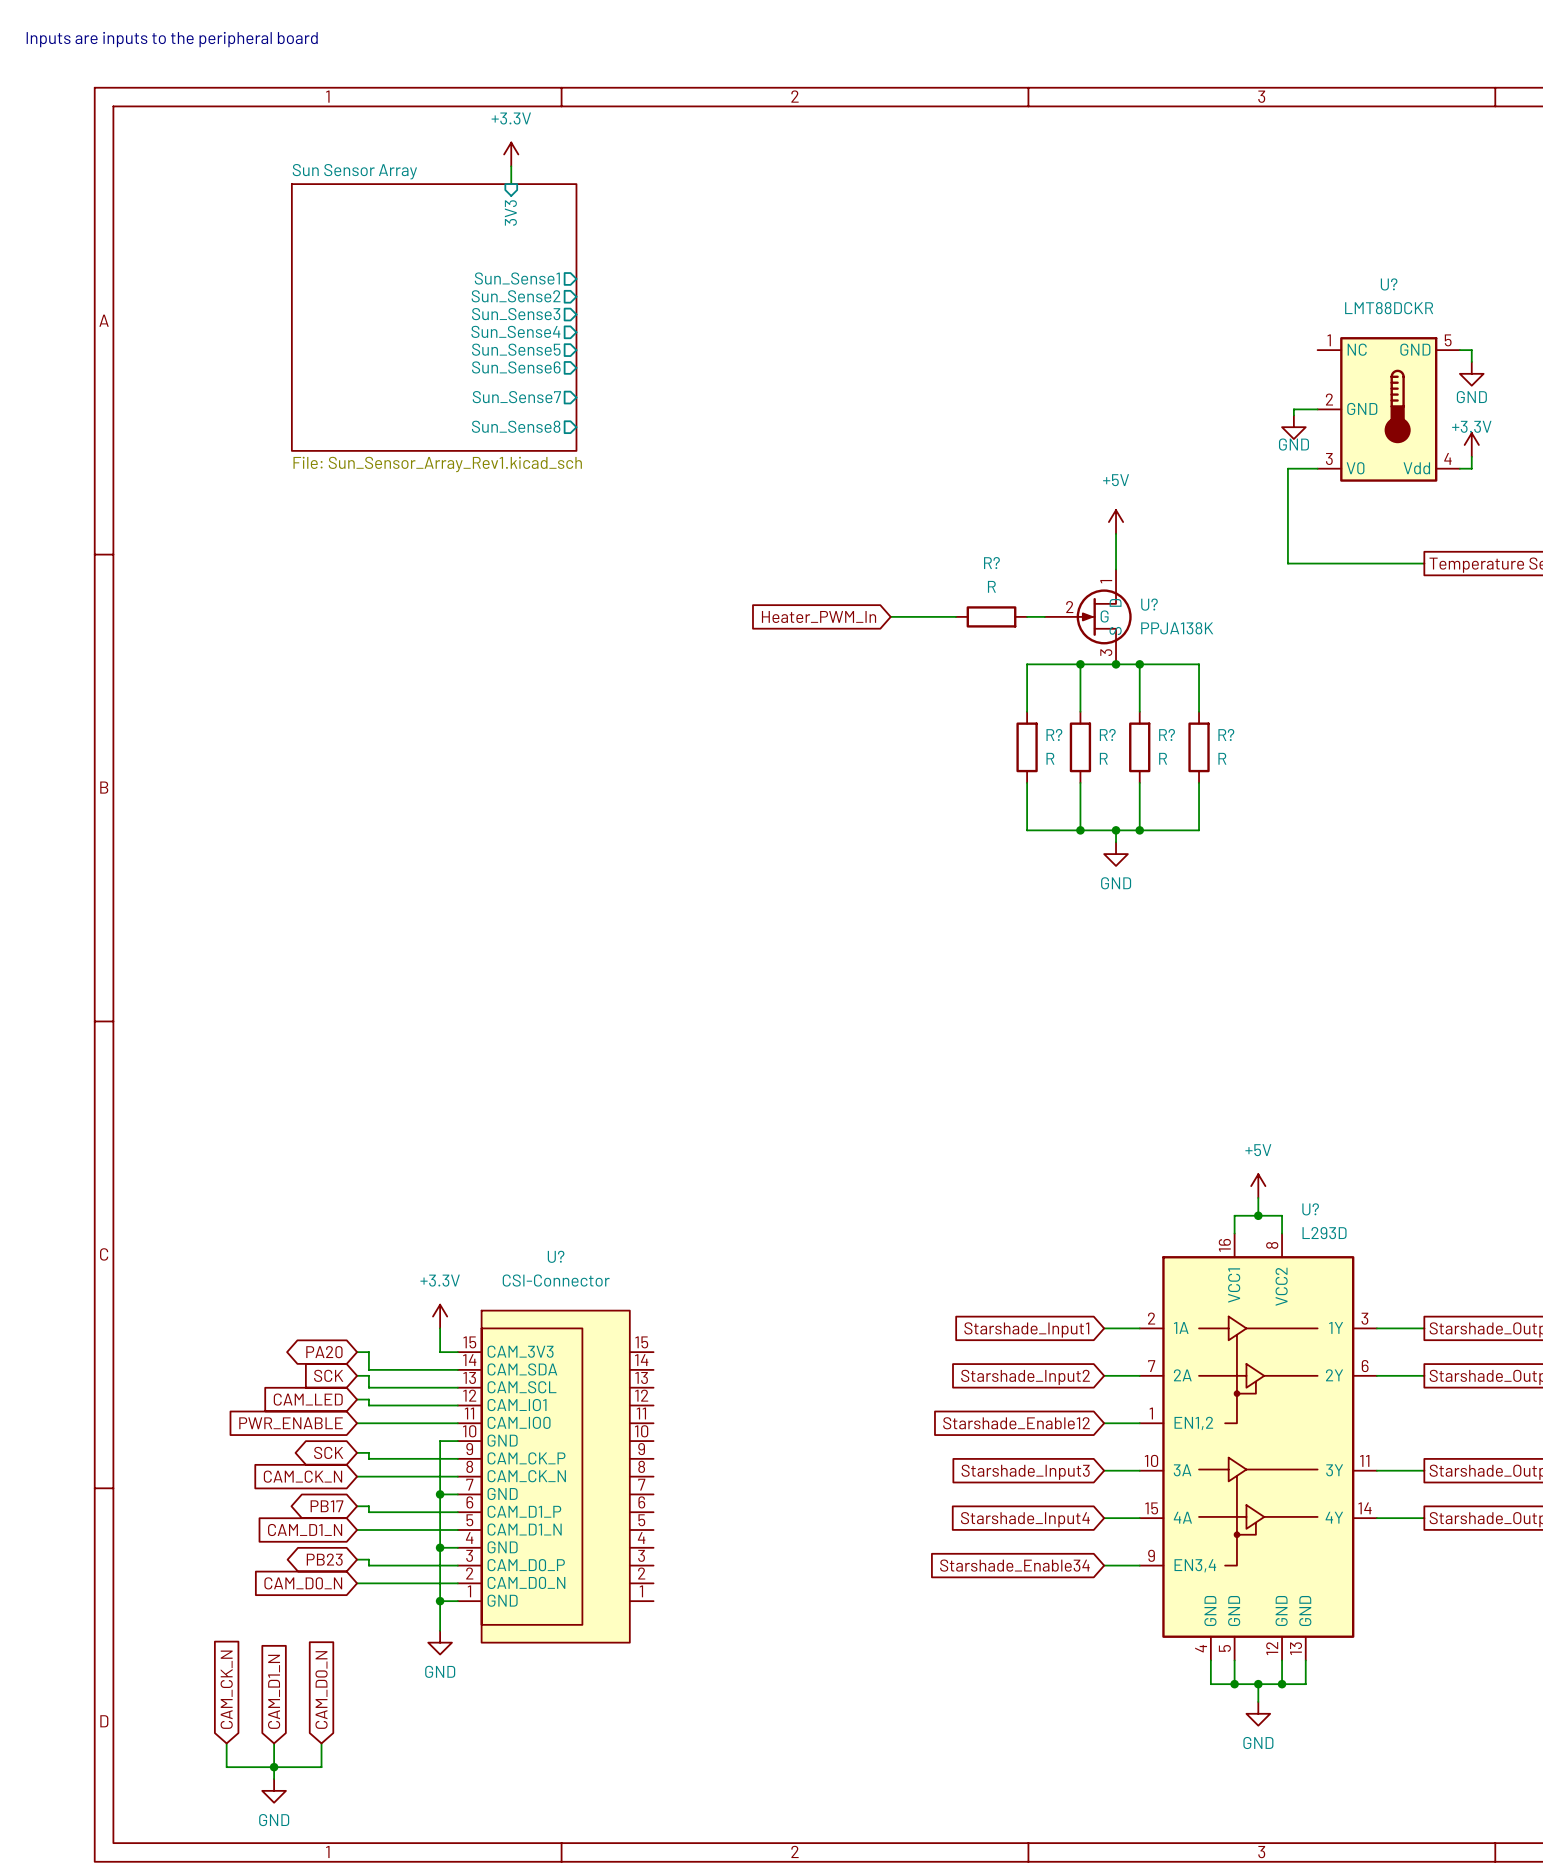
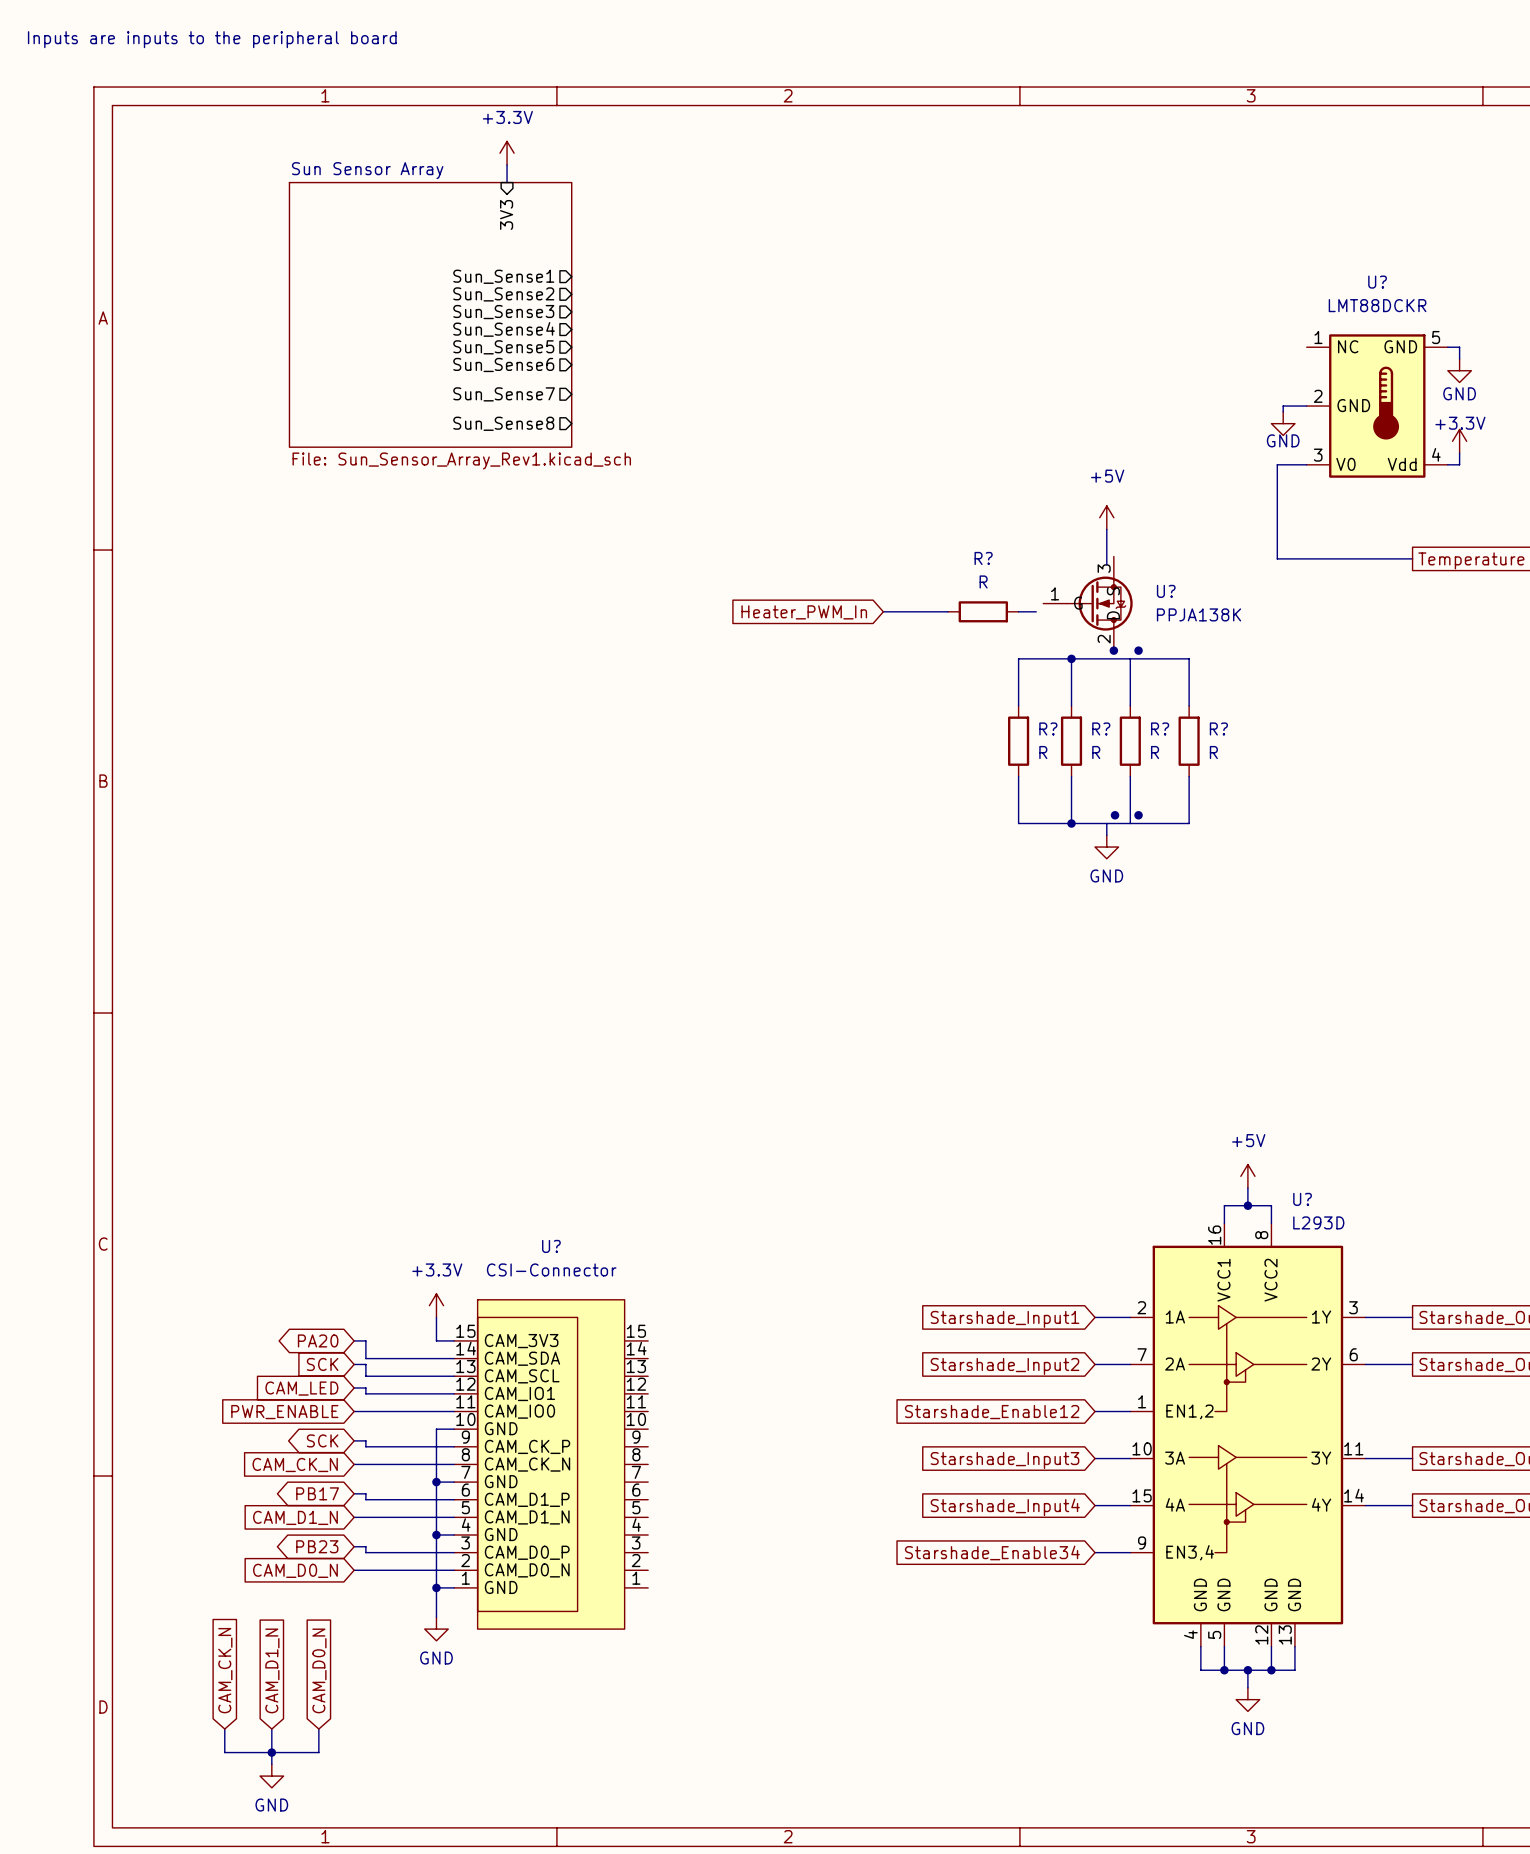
U?: none -> PPJA138K (1087, 603)
U?: PPJA138K (1088, 616) -> none
junction: none -> (1113, 650)
junction: none -> (1138, 650)
junction: (1116, 664) -> none
junction: (1139, 664) -> none
junction: none -> (1115, 815)
junction: none -> (1138, 815)
junction: (1116, 830) -> none
junction: (1139, 830) -> none

